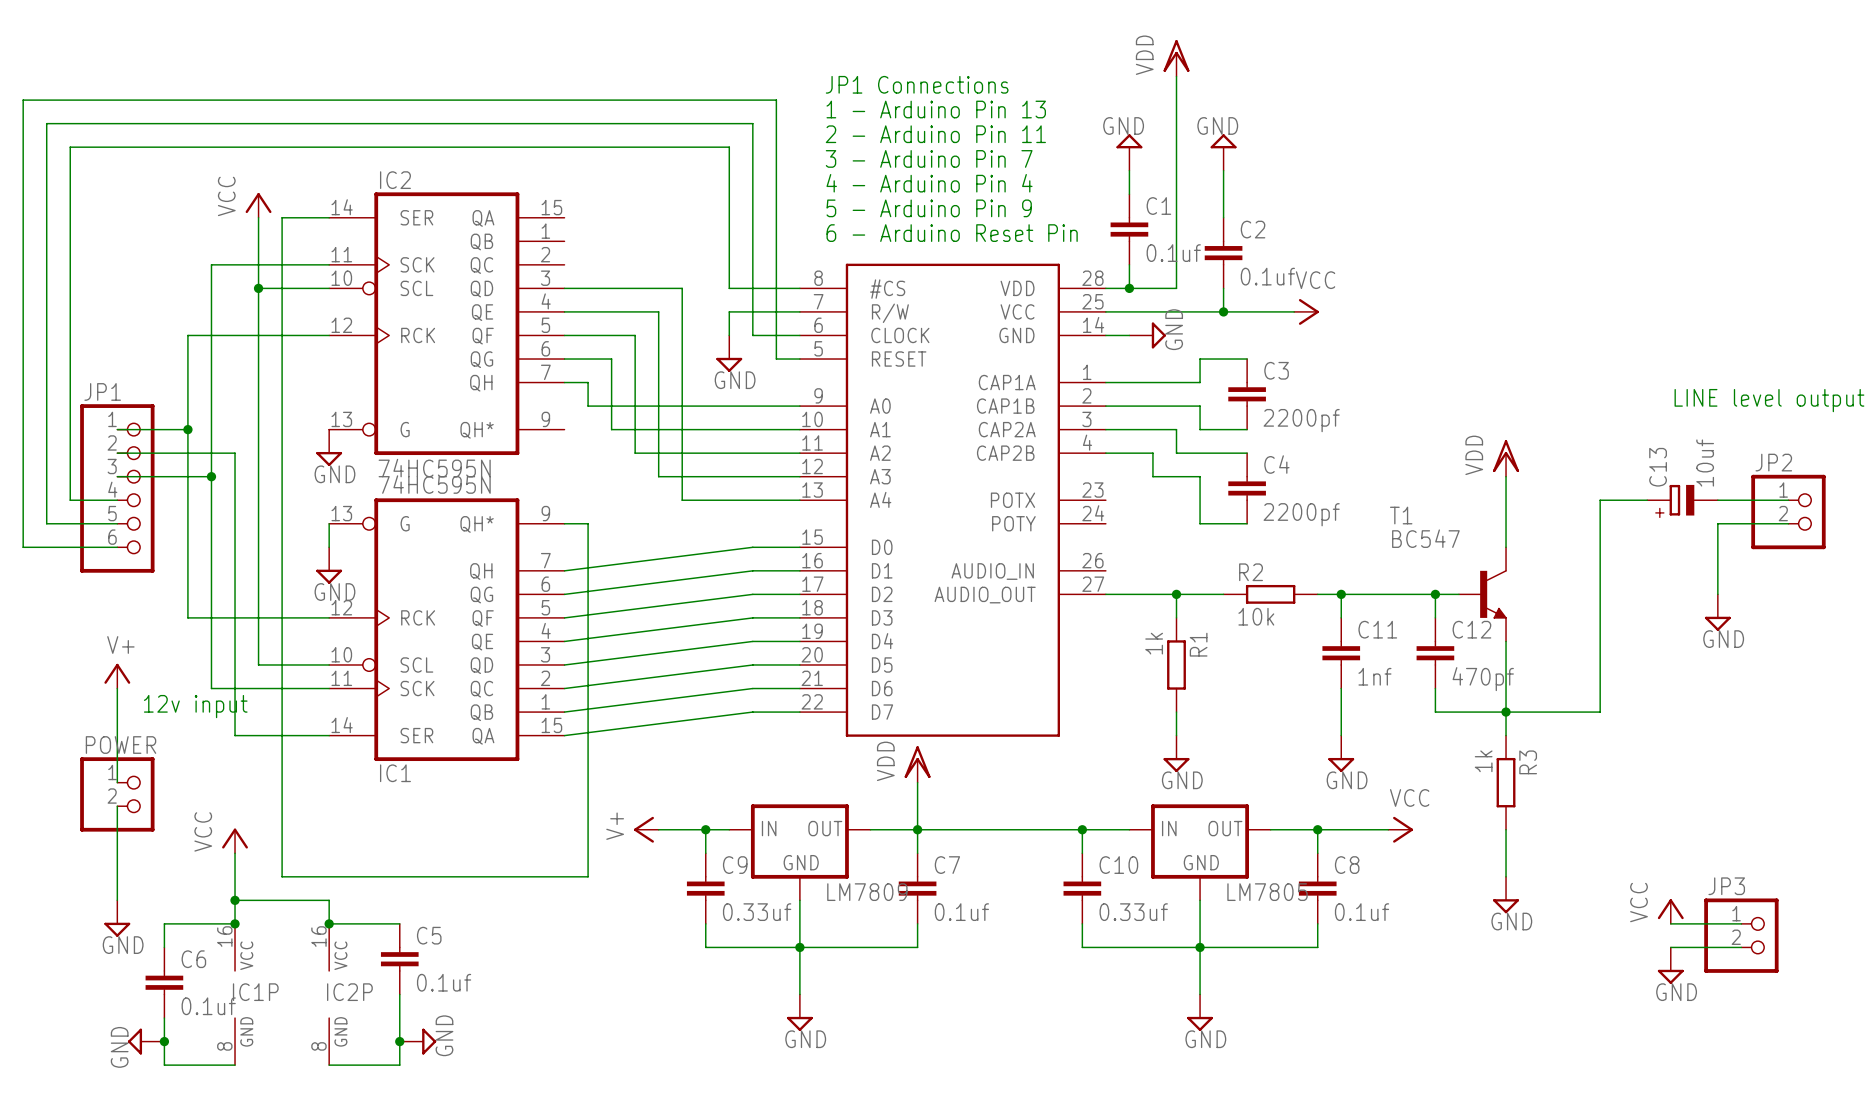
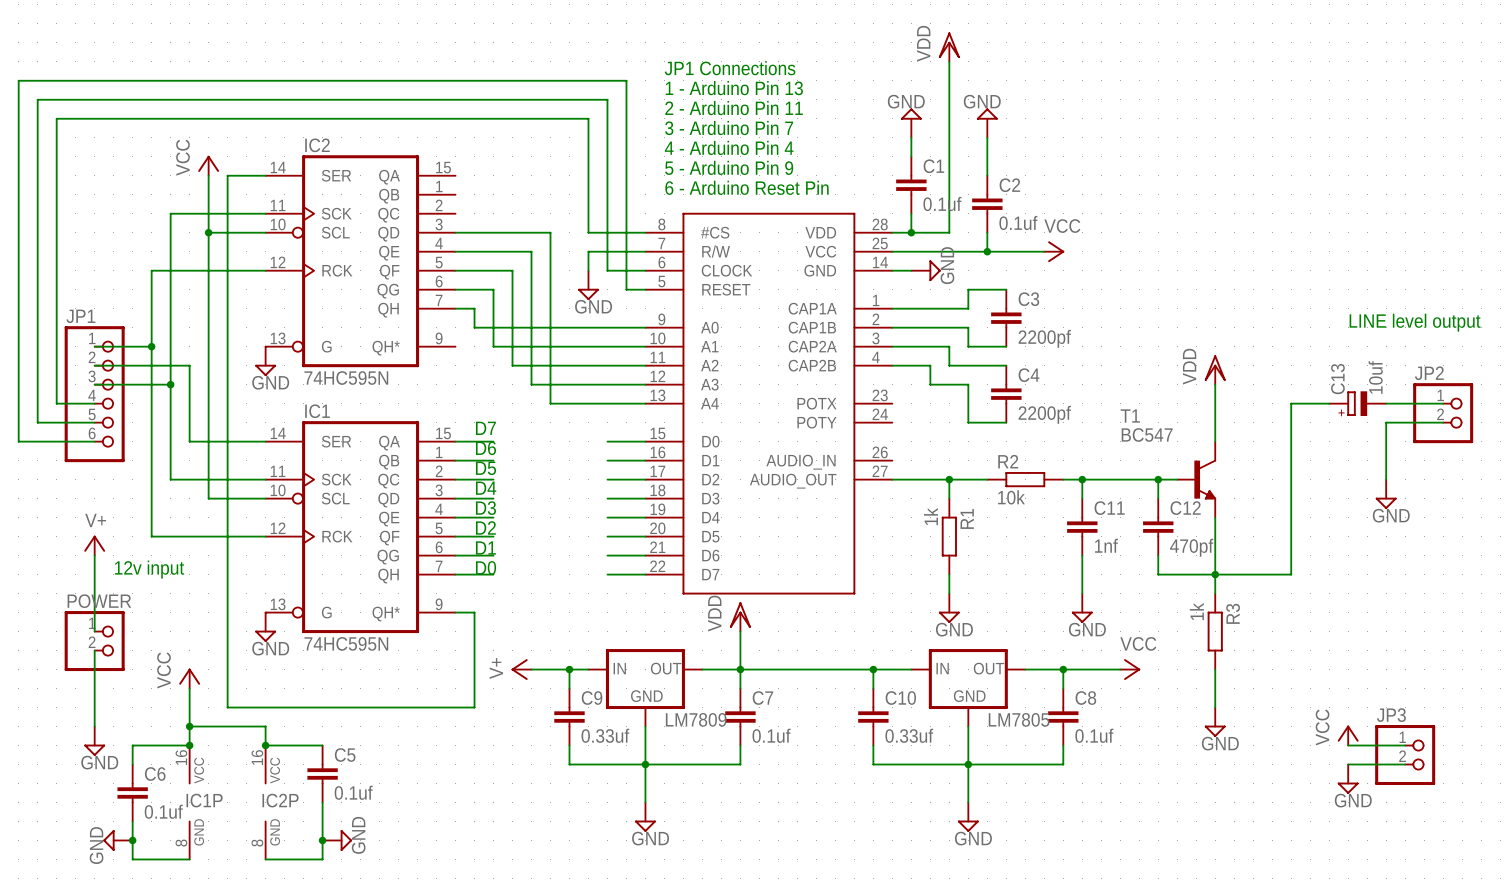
wire: (329, 523) (329, 547) -> (189, 441) (265, 441)
wire: (564, 523) (588, 523) (588, 759) -> (455, 612) (474, 612)
text: none -> D7 (485, 428)
wire: (235, 547) (235, 735) (329, 735) -> none
wire: none -> (455, 441) (493, 441)
wire: (752, 547) (564, 570) -> (493, 460) (455, 460)
text: none -> D6 (485, 448)
power symbol position: GND (329, 565) -> GND (265, 627)
wire: (752, 570) (564, 594) -> (493, 479) (455, 479)
text: none -> D5 (485, 468)
wire: (211, 594) (211, 688) (329, 688) -> (170, 479) (265, 479)
wire: (752, 594) (564, 617) -> (493, 498) (455, 498)
text: none -> D4 (486, 488)
wire: (187, 617) (258, 617) (258, 664) -> (151, 498) (151, 536) (208, 536)
wire: (752, 617) (564, 641) -> (493, 517) (455, 517)
IC1 flip: as is (446, 629) -> up-down (360, 527)
text: none -> D3 (485, 508)
wire: (752, 641) (564, 664) -> (493, 536) (455, 536)
text: none -> D2 (485, 527)
wire: (752, 664) (564, 688) -> (493, 555) (455, 555)
text: none -> D1 (485, 547)
wire: (752, 688) (564, 712) -> (493, 574) (455, 574)
text: none -> D0 (486, 567)
wire: (752, 712) (564, 735) -> none

